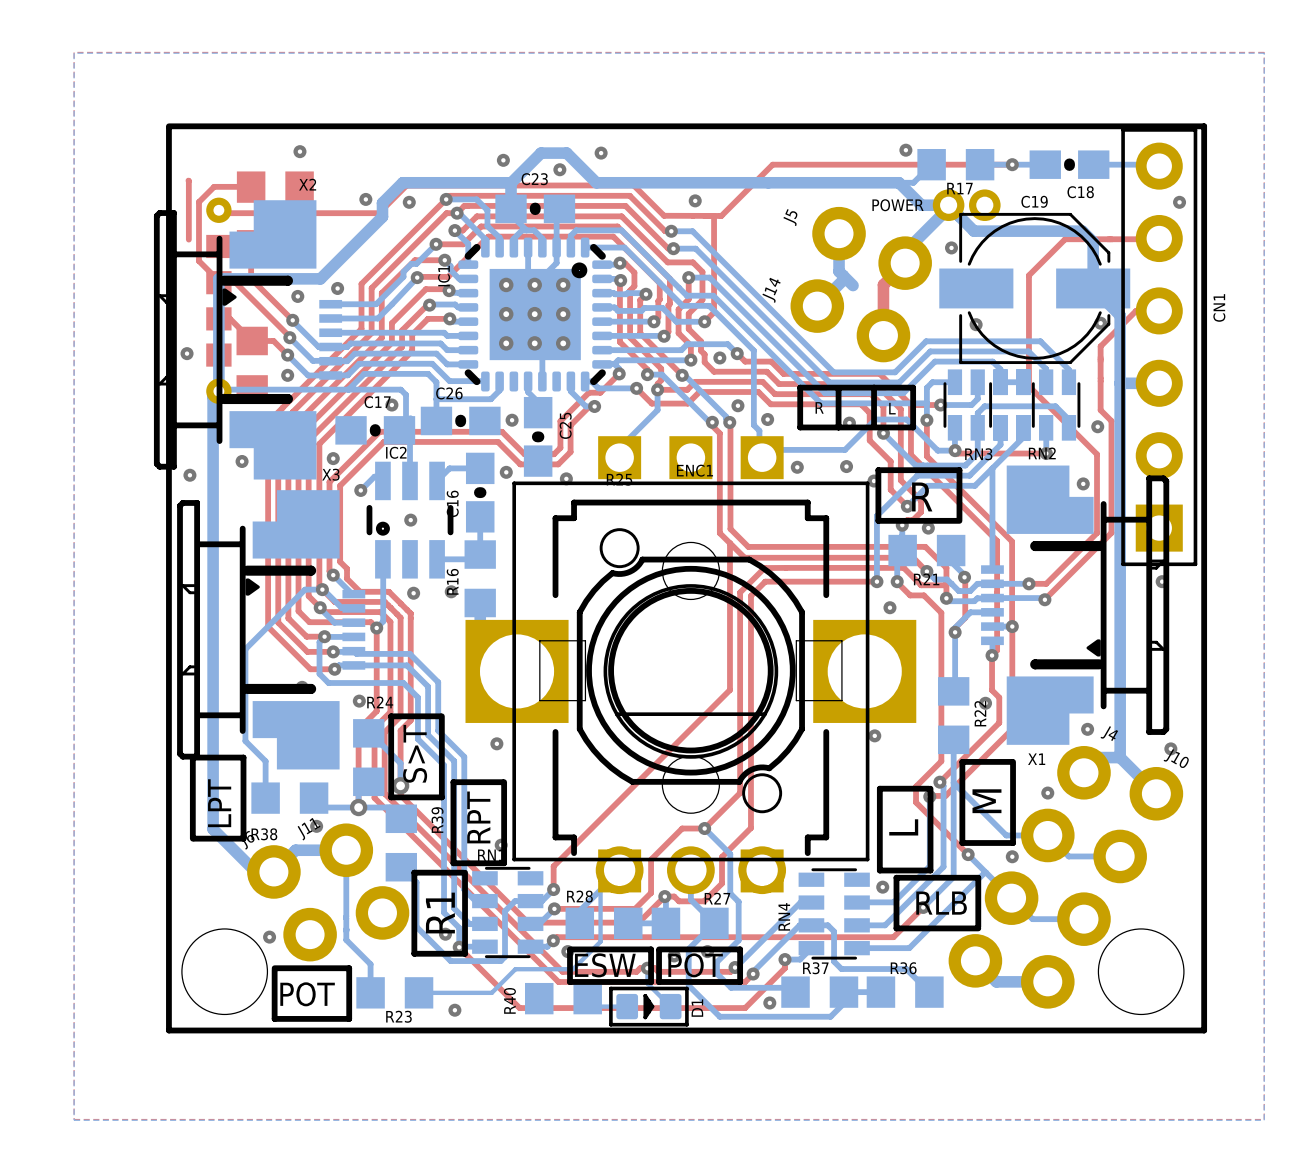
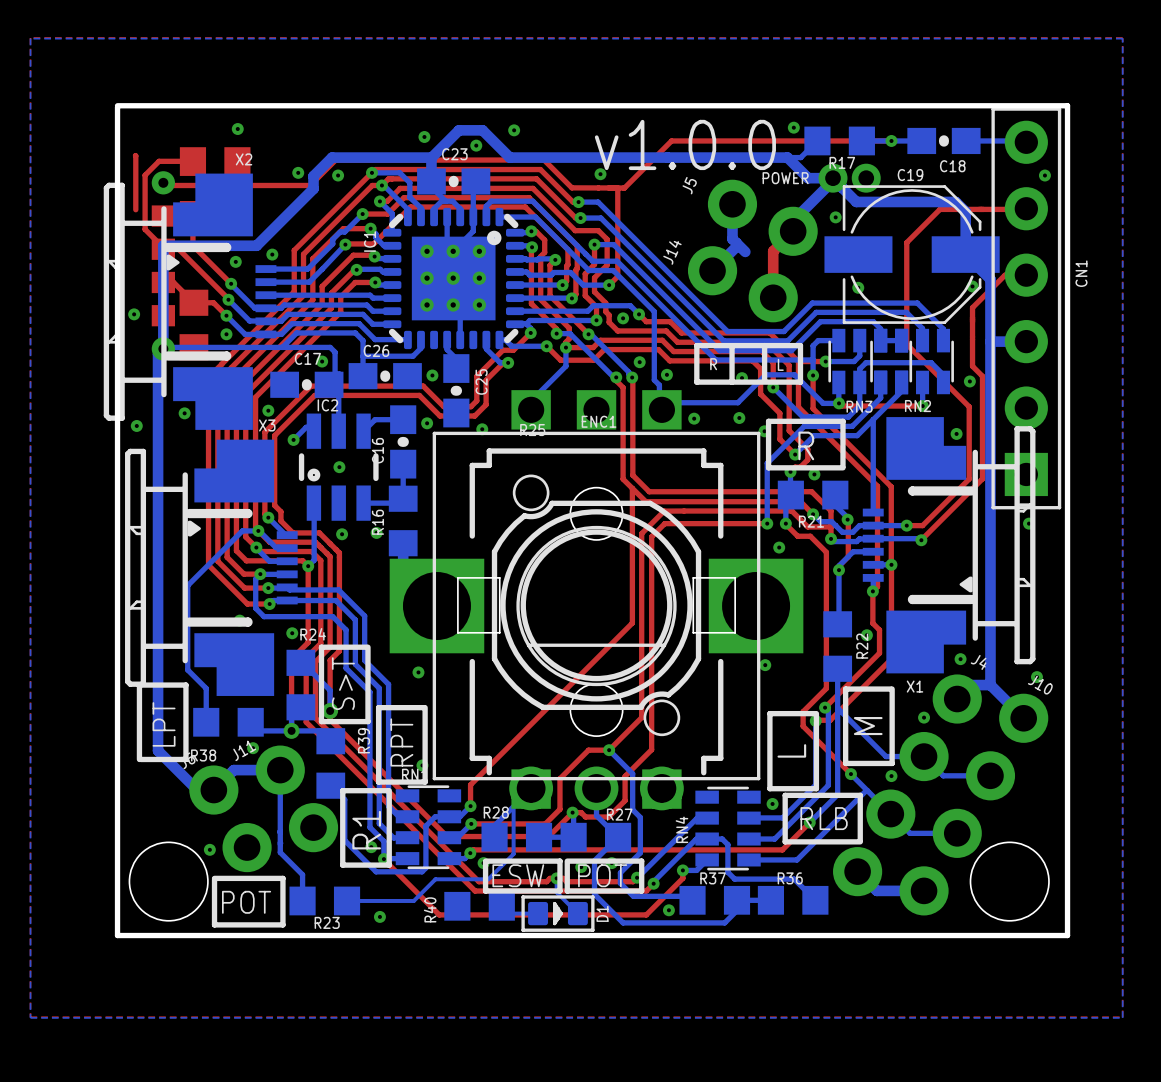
text: none -> v1.0.0 (685, 144)

